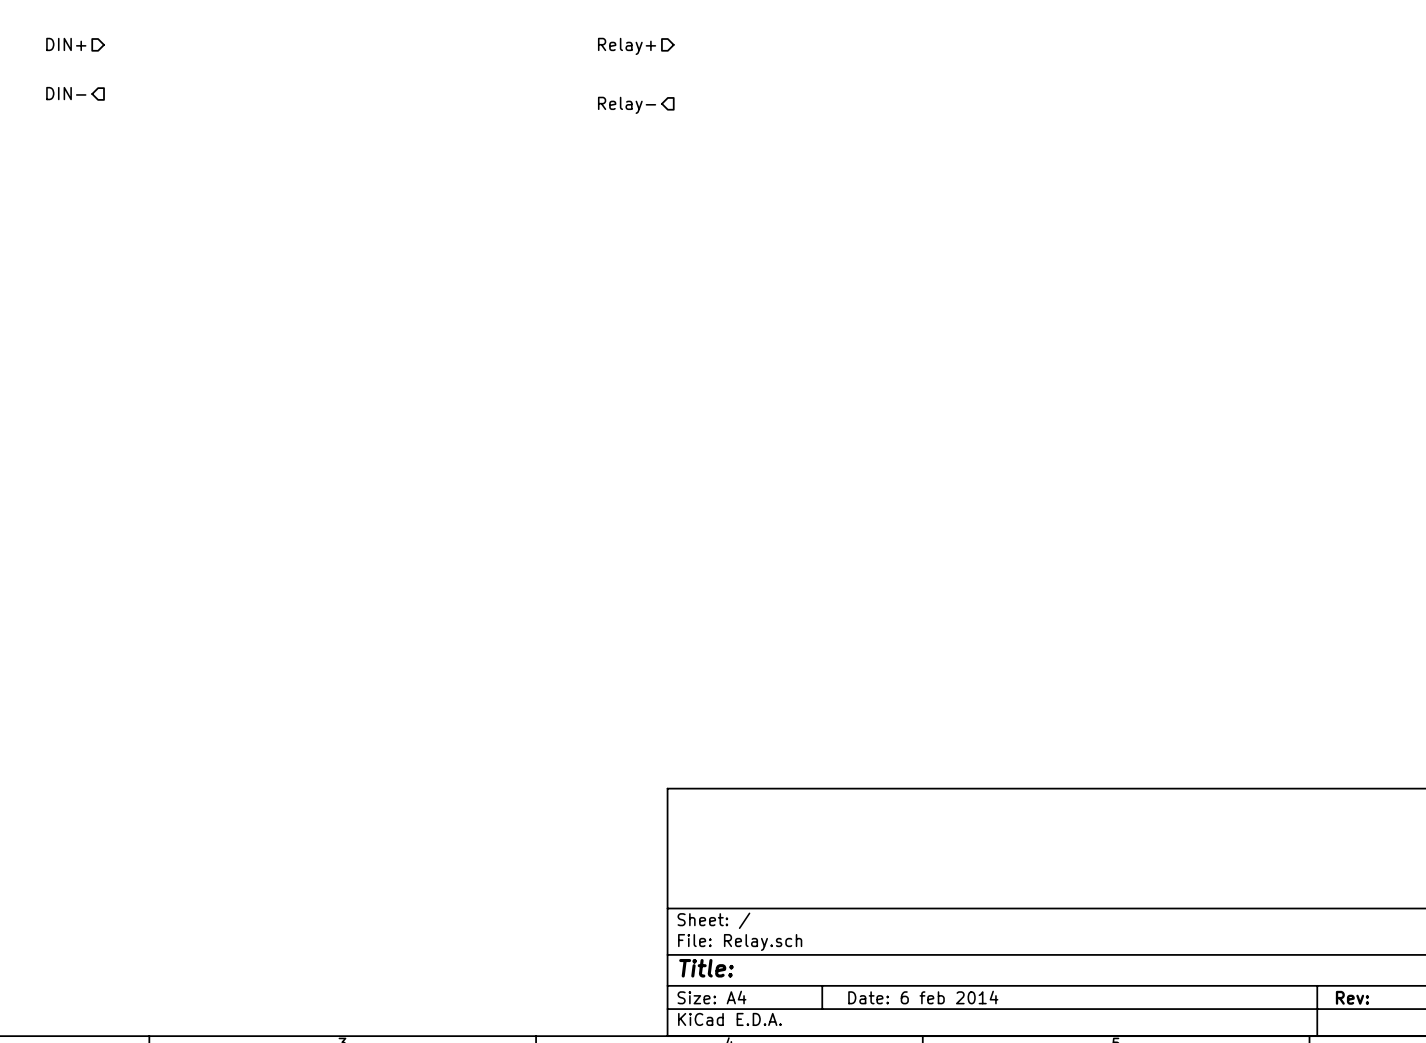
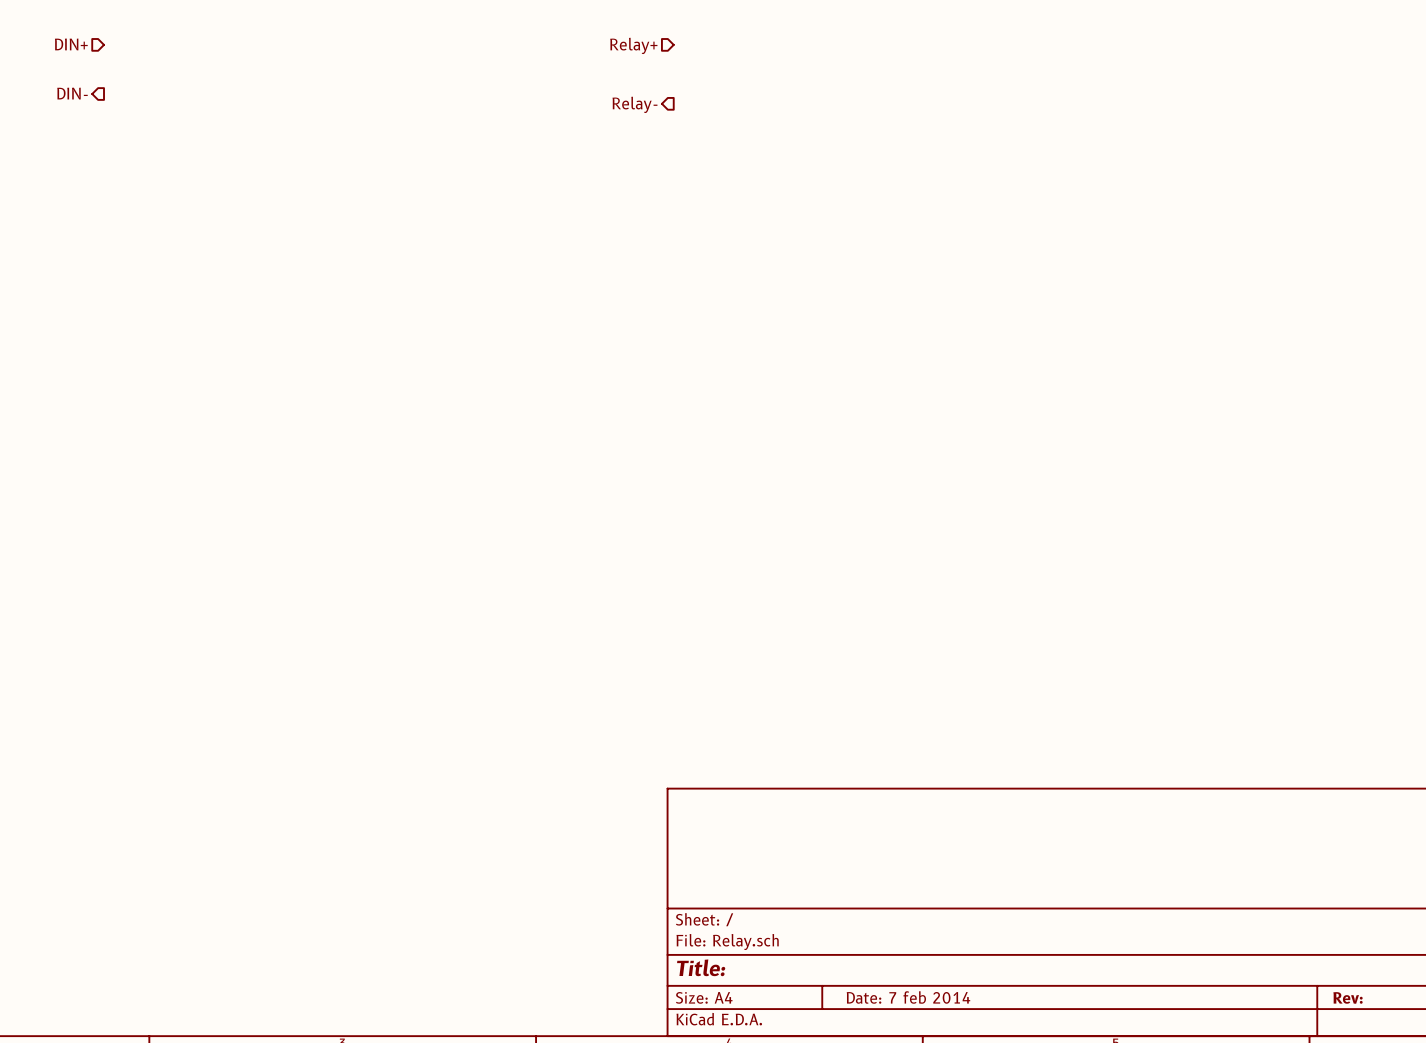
title block: Date: 6 feb 2014 (923, 997) -> Date: 7 feb 2014 (908, 997)

